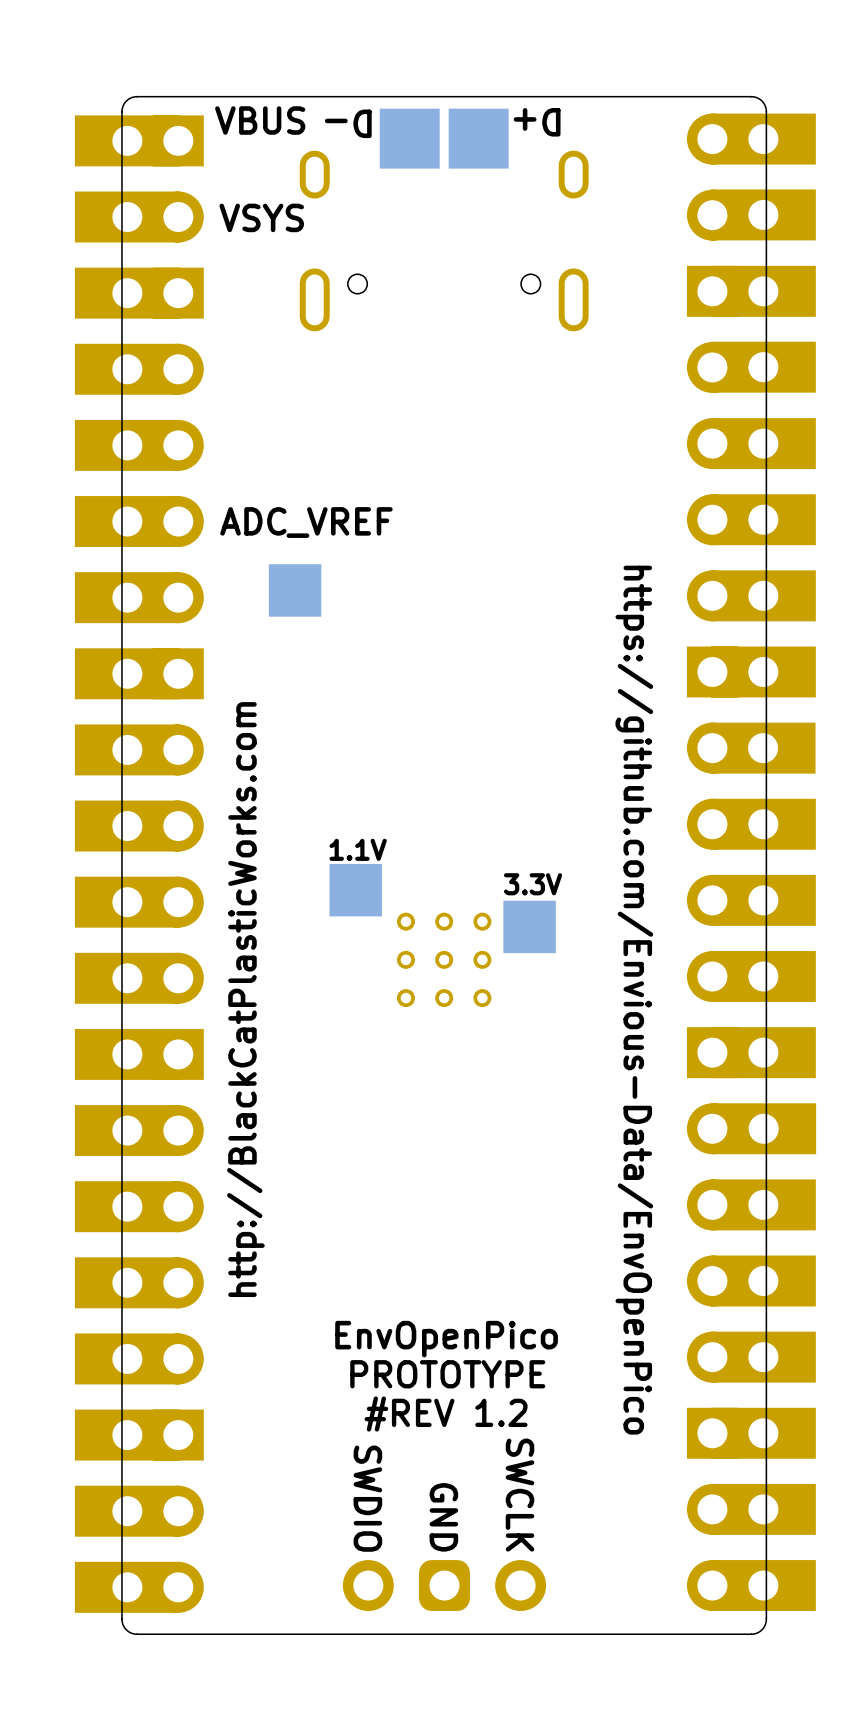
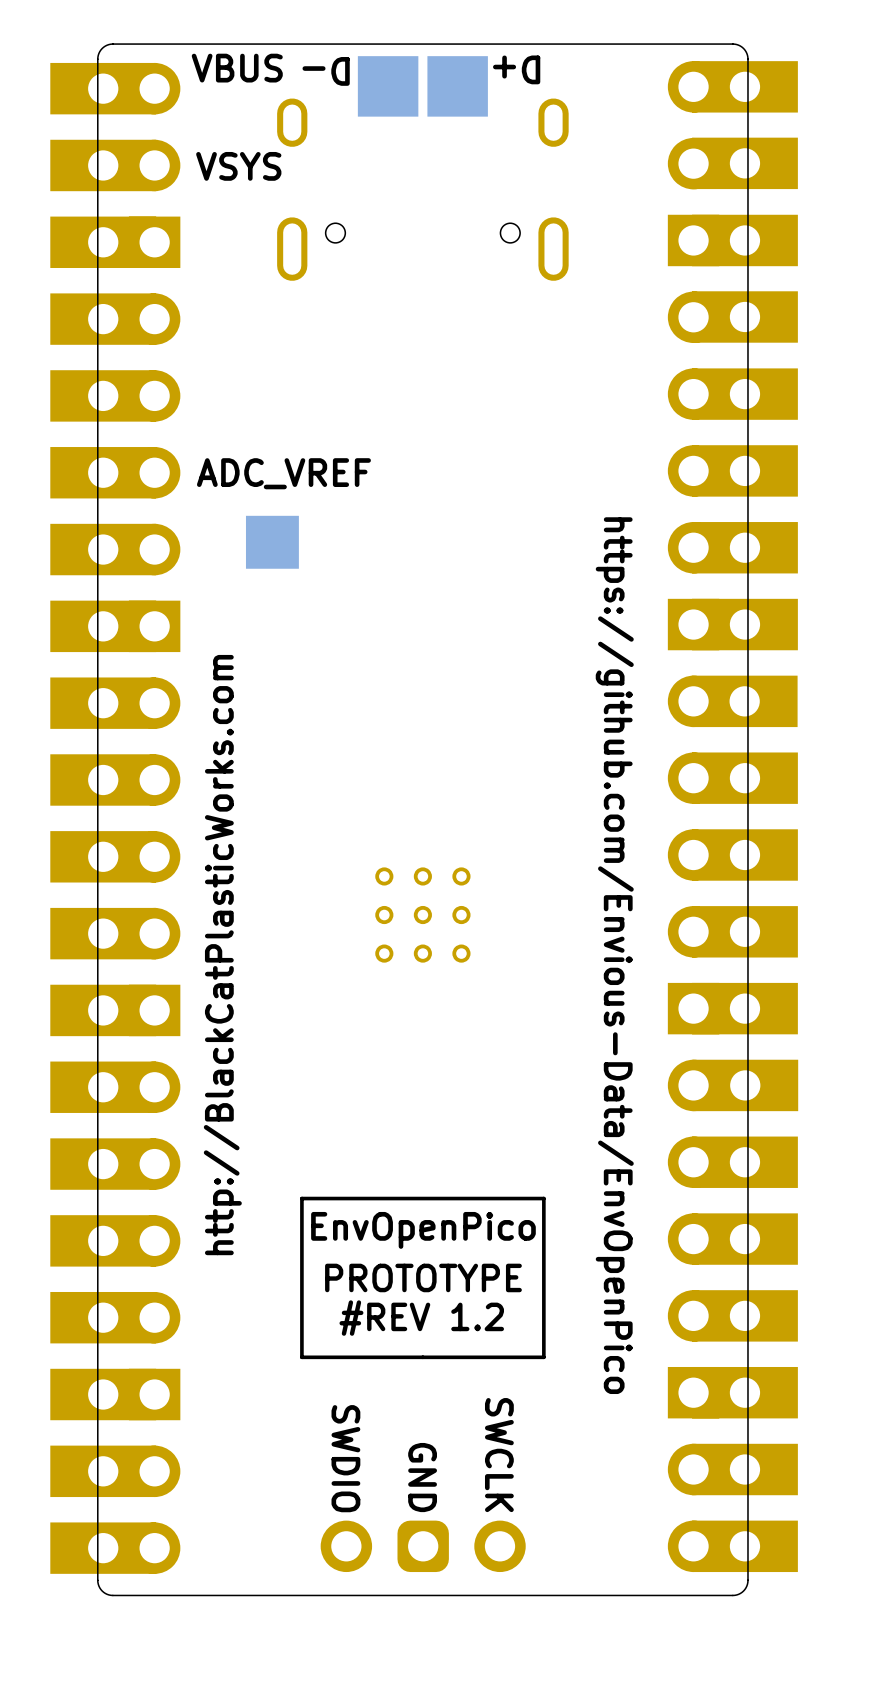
part footprint: [74, 115, 204, 1613] -> [50, 62, 181, 1574]
text: 1.1V (358, 849) -> none
text: 3.3V (533, 884) -> none
part: (355, 890) -> none
part: (529, 926) -> none
line: none -> (543, 1198) (301, 1198) (301, 1357) (543, 1357) (543, 1198)
text position: EnvOpenPico (446, 1339) -> EnvOpenPico (423, 1230)
text position: PROTOTYPE (447, 1374) -> PROTOTYPE (423, 1277)
text position: #REV 1.2 (446, 1414) -> #REV 1.2 (421, 1318)

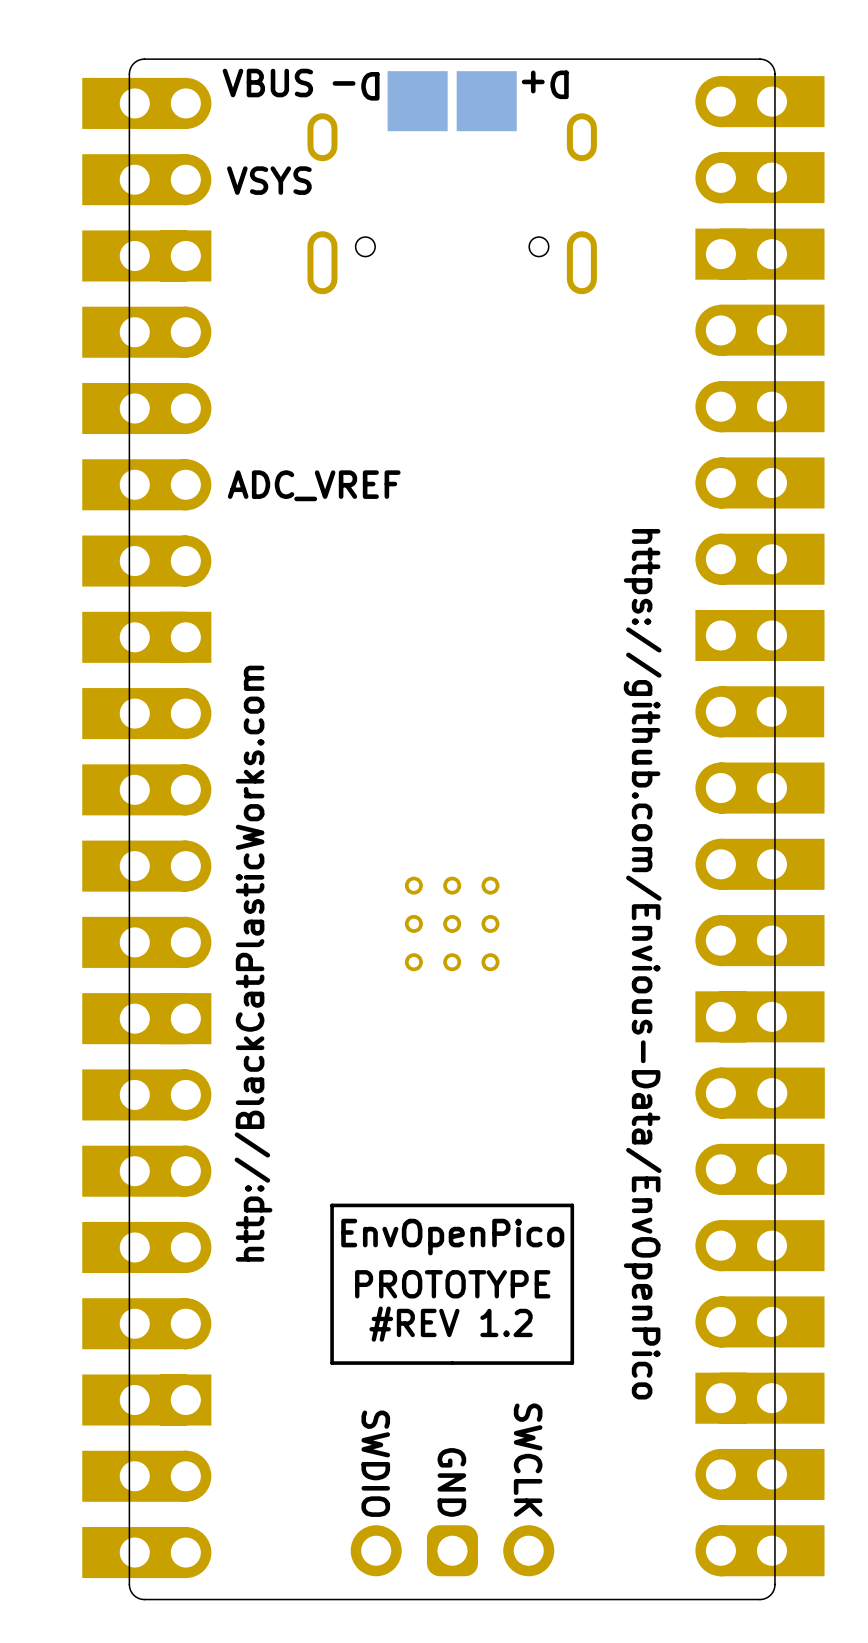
part: (272, 542) -> none

